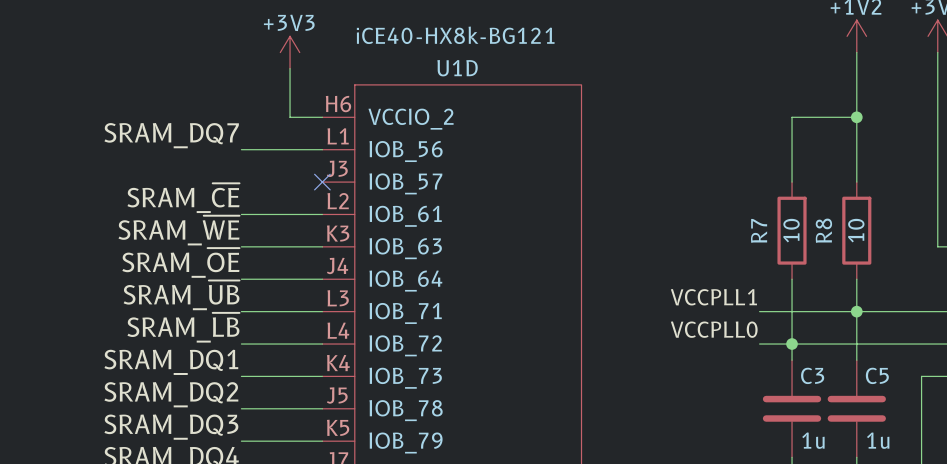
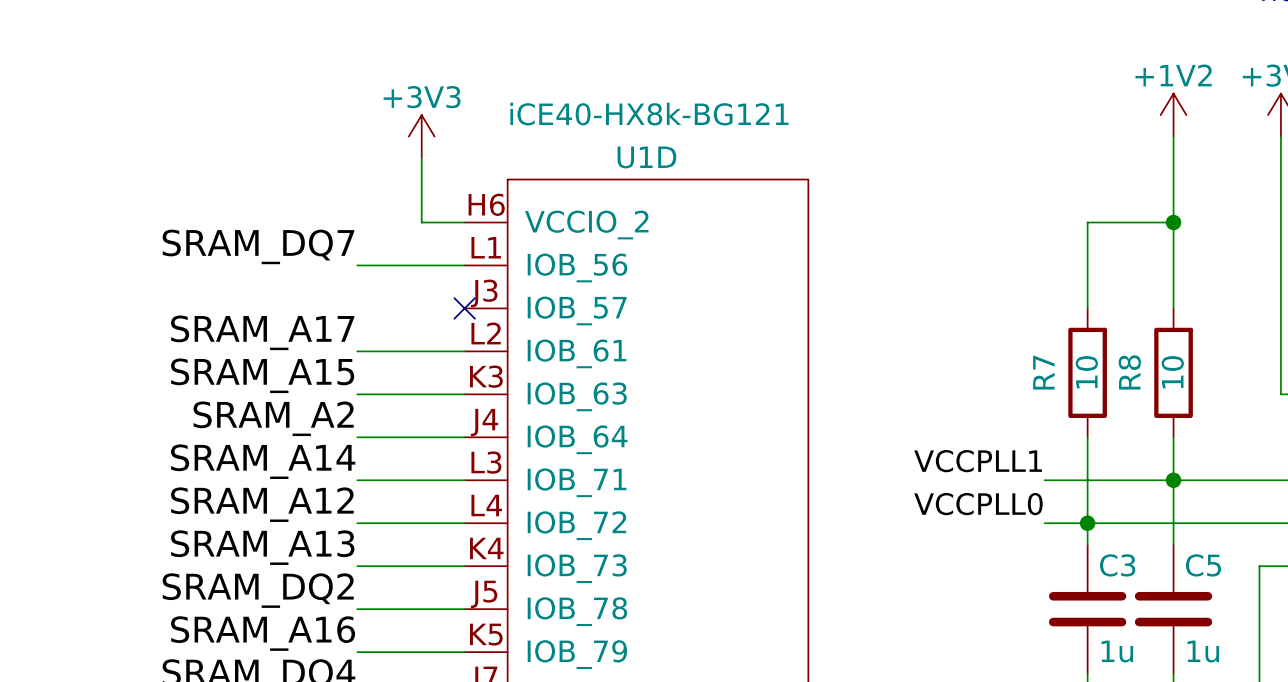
label: SRAM_~{CE} (183, 198) -> SRAM_A17 (262, 332)
label: SRAM_~{WE} (178, 230) -> SRAM_A15 (262, 375)
label: SRAM_~{OE} (180, 262) -> SRAM_A2 (273, 418)
label: SRAM_~{UB} (181, 295) -> SRAM_A14 (263, 461)
label: SRAM_~{LB} (183, 327) -> SRAM_A12 (262, 504)
label: SRAM_DQ1 (171, 362) -> SRAM_A13 (262, 547)
label: SRAM_DQ3 (171, 427) -> SRAM_A16 (263, 633)

